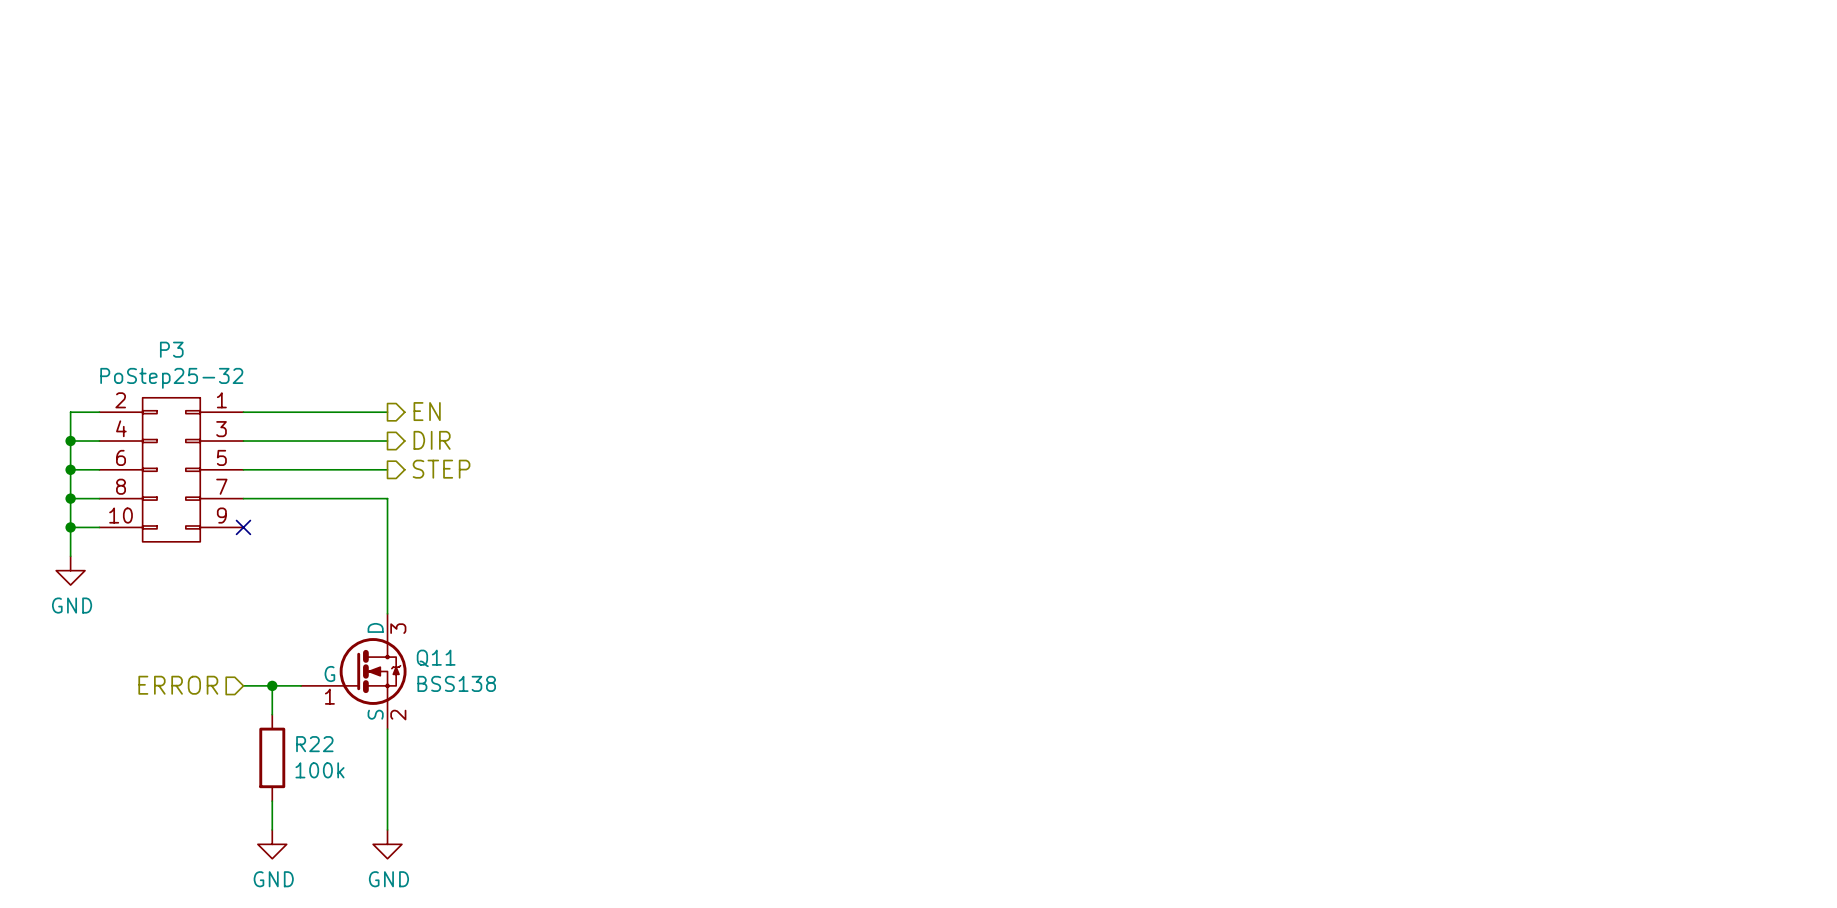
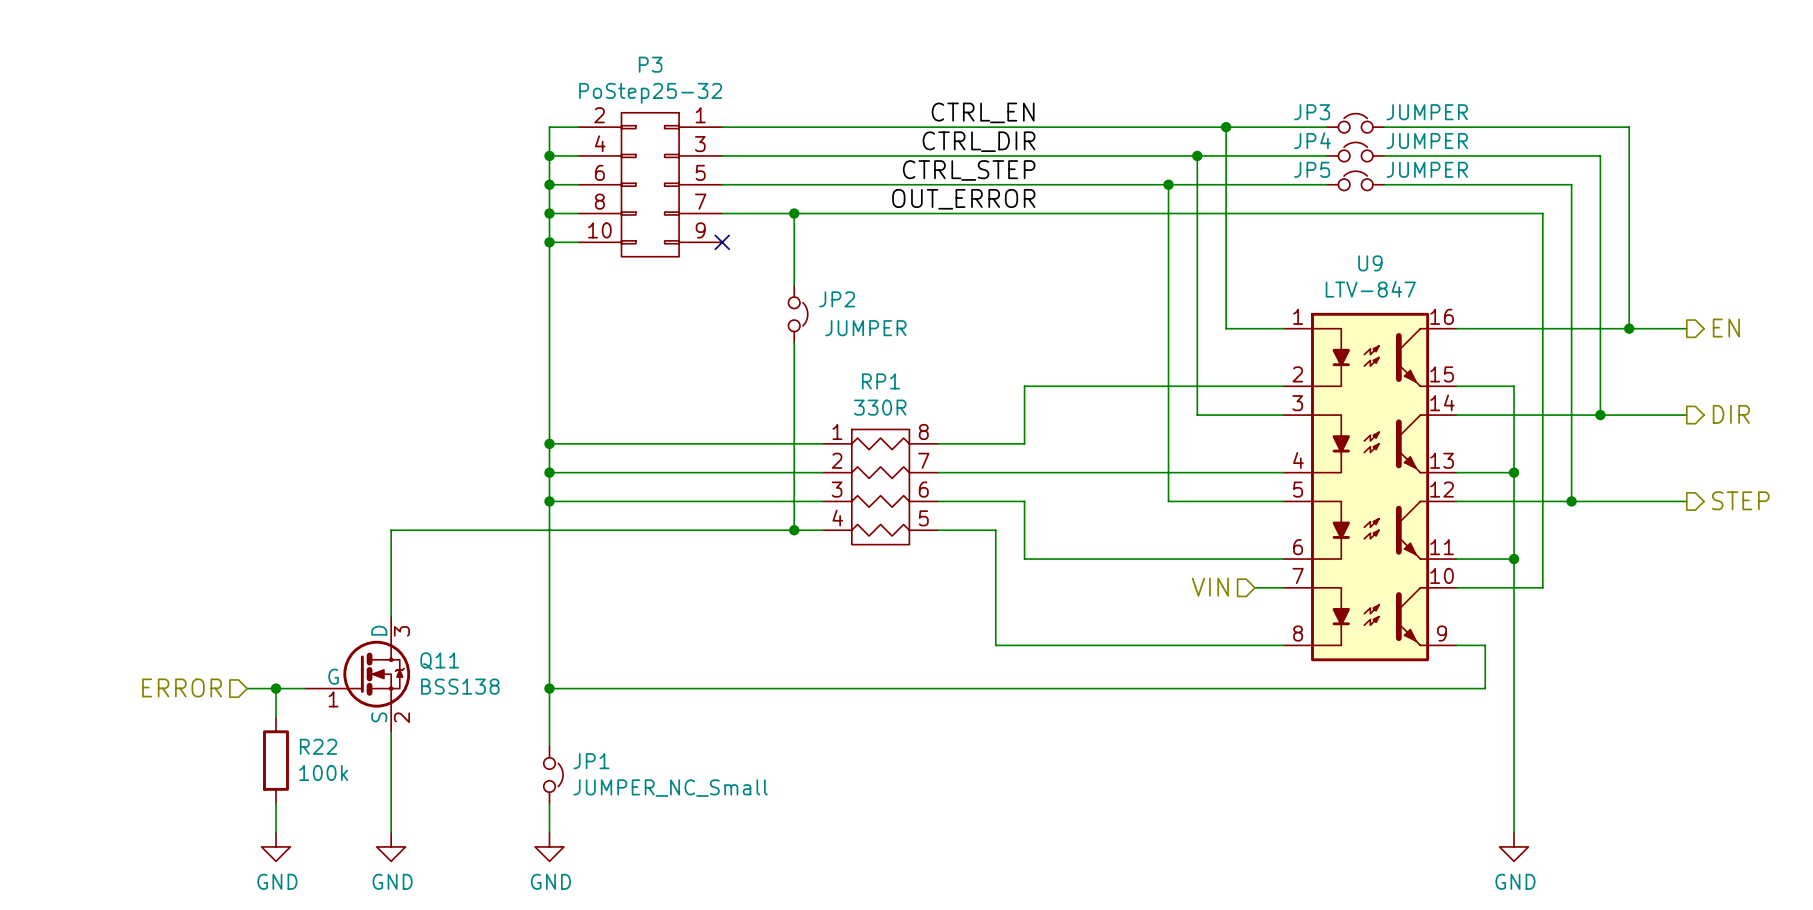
label: none -> CTRL_EN (983, 112)
JP3: none -> JUMPER (1355, 123)
wire: none -> (578, 127) (549, 127) (549, 746)
wire: none -> (722, 127) (1326, 127)
wire: none -> (1226, 127) (1226, 328) (1283, 328)
junction: none -> (1226, 127)
wire: none -> (1384, 127) (1629, 127) (1629, 328)
label: none -> CTRL_DIR (979, 141)
JP4: none -> JUMPER (1355, 152)
wire: none -> (549, 155) (578, 155)
junction: none -> (549, 155)
wire: none -> (722, 155) (1326, 155)
wire: none -> (1197, 155) (1197, 415) (1283, 415)
junction: none -> (1197, 155)
wire: none -> (1384, 155) (1600, 155) (1600, 415)
label: none -> CTRL_STEP (969, 170)
JP5: none -> JUMPER (1355, 180)
wire: none -> (549, 184) (578, 184)
junction: none -> (549, 184)
wire: none -> (722, 184) (1326, 184)
wire: none -> (1168, 184) (1168, 501) (1283, 501)
junction: none -> (1168, 184)
wire: none -> (1384, 184) (1571, 184) (1571, 501)
label: none -> OUT_ERROR (963, 199)
wire: none -> (549, 213) (578, 213)
junction: none -> (549, 213)
wire: none -> (722, 213) (1542, 213) (1542, 587) (1456, 587)
wire: none -> (794, 213) (794, 285)
junction: none -> (794, 213)
wire: none -> (549, 242) (578, 242)
junction: none -> (549, 242)
no-connect mark: none -> (722, 242)
JP2: none -> JUMPER (798, 314)
wire: none -> (1456, 328) (1686, 328)
junction: none -> (1629, 328)
hierarchical label: none -> EN (1726, 328)
wire: none -> (794, 343) (794, 530)
wire: none -> (1283, 386) (1024, 386) (1024, 443) (938, 443)
wire: none -> (1456, 386) (1514, 386) (1514, 832)
hierarchical label: EN (427, 411) -> none
hierarchical label: none -> DIR (1731, 414)
wire: (99, 412) (70, 412) (70, 556) -> none
wire: (243, 412) (387, 412) -> none
wire: none -> (1456, 415) (1686, 415)
junction: none -> (1600, 415)
hierarchical label: DIR (432, 440) -> none
wire: (70, 441) (99, 441) -> none
junction: (70, 441) -> none
wire: (243, 441) (387, 441) -> none
wire: none -> (549, 443) (823, 443)
junction: none -> (549, 443)
wire: (70, 469) (99, 469) -> none
junction: (70, 469) -> none
P3 position: (171, 469) -> (650, 184)
wire: (243, 469) (387, 469) -> none
hierarchical label: STEP (441, 469) -> none
wire: none -> (549, 472) (823, 472)
junction: none -> (549, 472)
wire: none -> (938, 472) (1283, 472)
wire: none -> (1456, 472) (1514, 472)
junction: none -> (1514, 472)
RP1: none -> 330R (880, 487)
U9: none -> LTV-847 (1370, 487)
hierarchical label: none -> STEP (1740, 500)
wire: (70, 498) (99, 498) -> none
junction: (70, 498) -> none
wire: (243, 498) (387, 498) (387, 527) -> (823, 530) (391, 530)
wire: none -> (549, 501) (823, 501)
junction: none -> (549, 501)
wire: none -> (938, 501) (1024, 501) (1024, 559) (1283, 559)
wire: none -> (1456, 501) (1686, 501)
junction: none -> (1571, 501)
wire: (70, 527) (99, 527) -> none
junction: (70, 527) -> none
no-connect mark: (243, 527) -> none
junction: none -> (794, 530)
wire: none -> (938, 530) (995, 530) (995, 645) (1283, 645)
wire: none -> (1456, 559) (1514, 559)
junction: none -> (1514, 559)
power symbol: GND (70, 570) -> none
hierarchical label: none -> VIN (1210, 587)
wire: none -> (1254, 587) (1283, 587)
wire: none -> (1456, 645) (1485, 645) (1485, 688) (549, 688)
junction: none -> (549, 688)
JP1: none -> JUMPER_NC_Small (553, 774)
wire: none -> (549, 803) (549, 832)
power symbol: none -> GND (549, 846)
power symbol: none -> GND (1514, 846)

